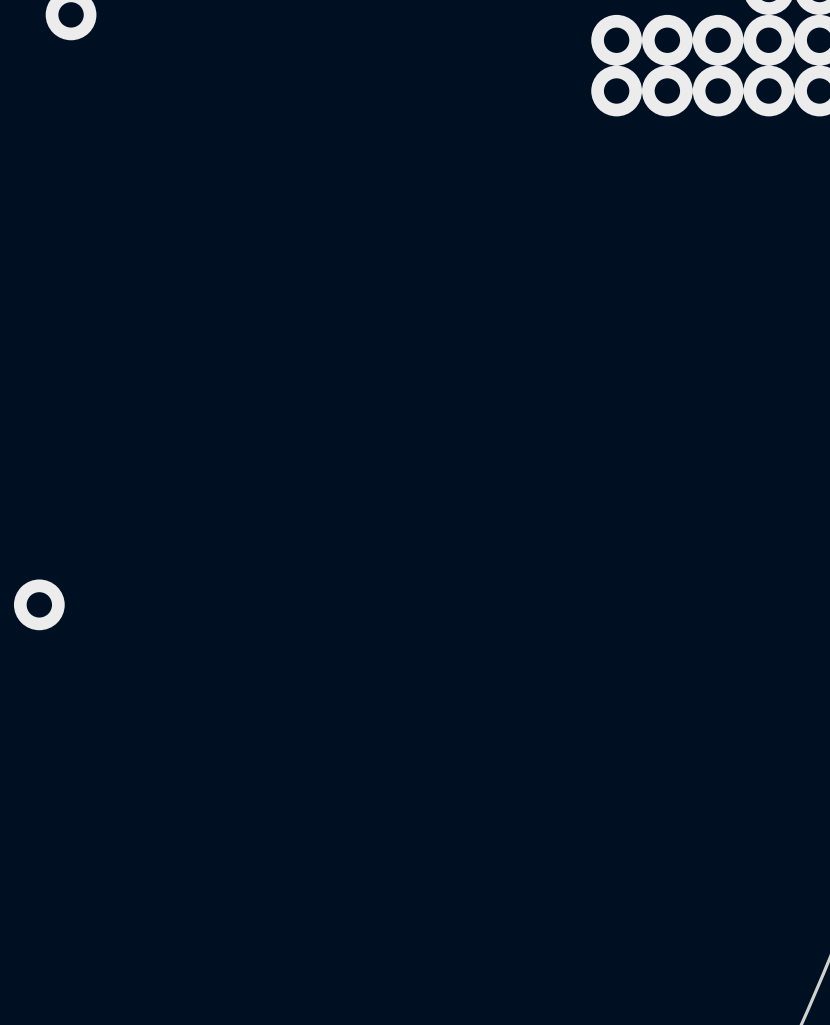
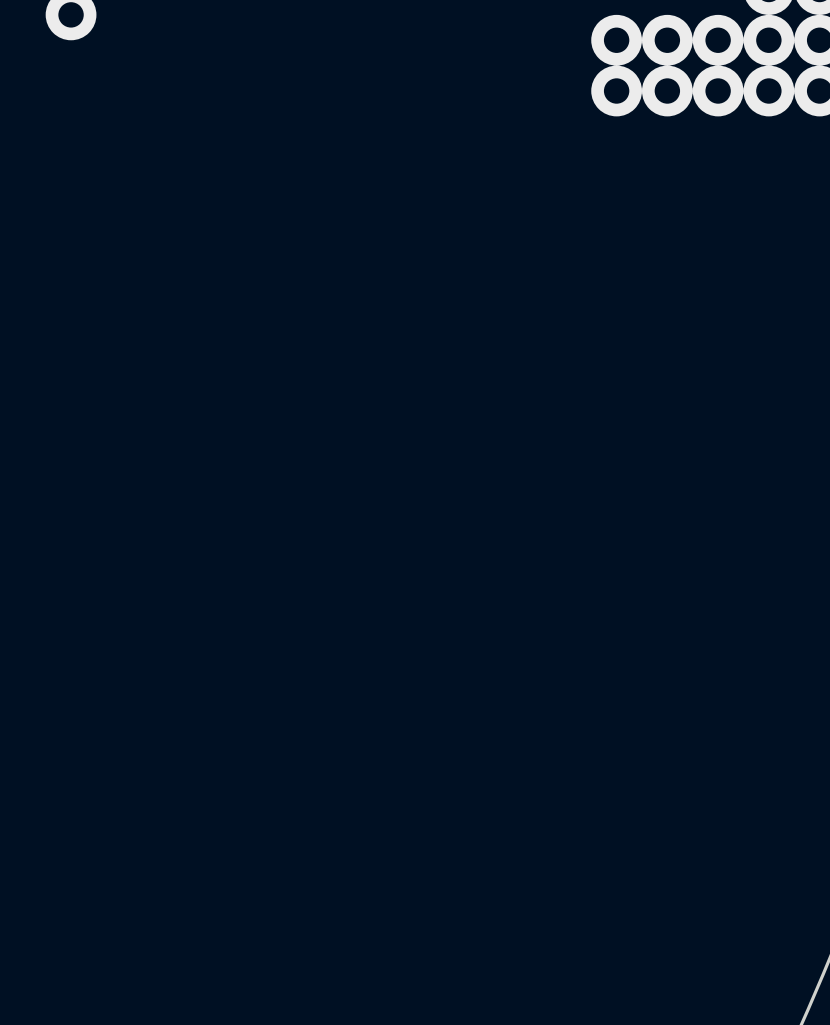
via: (39, 604) -> none

